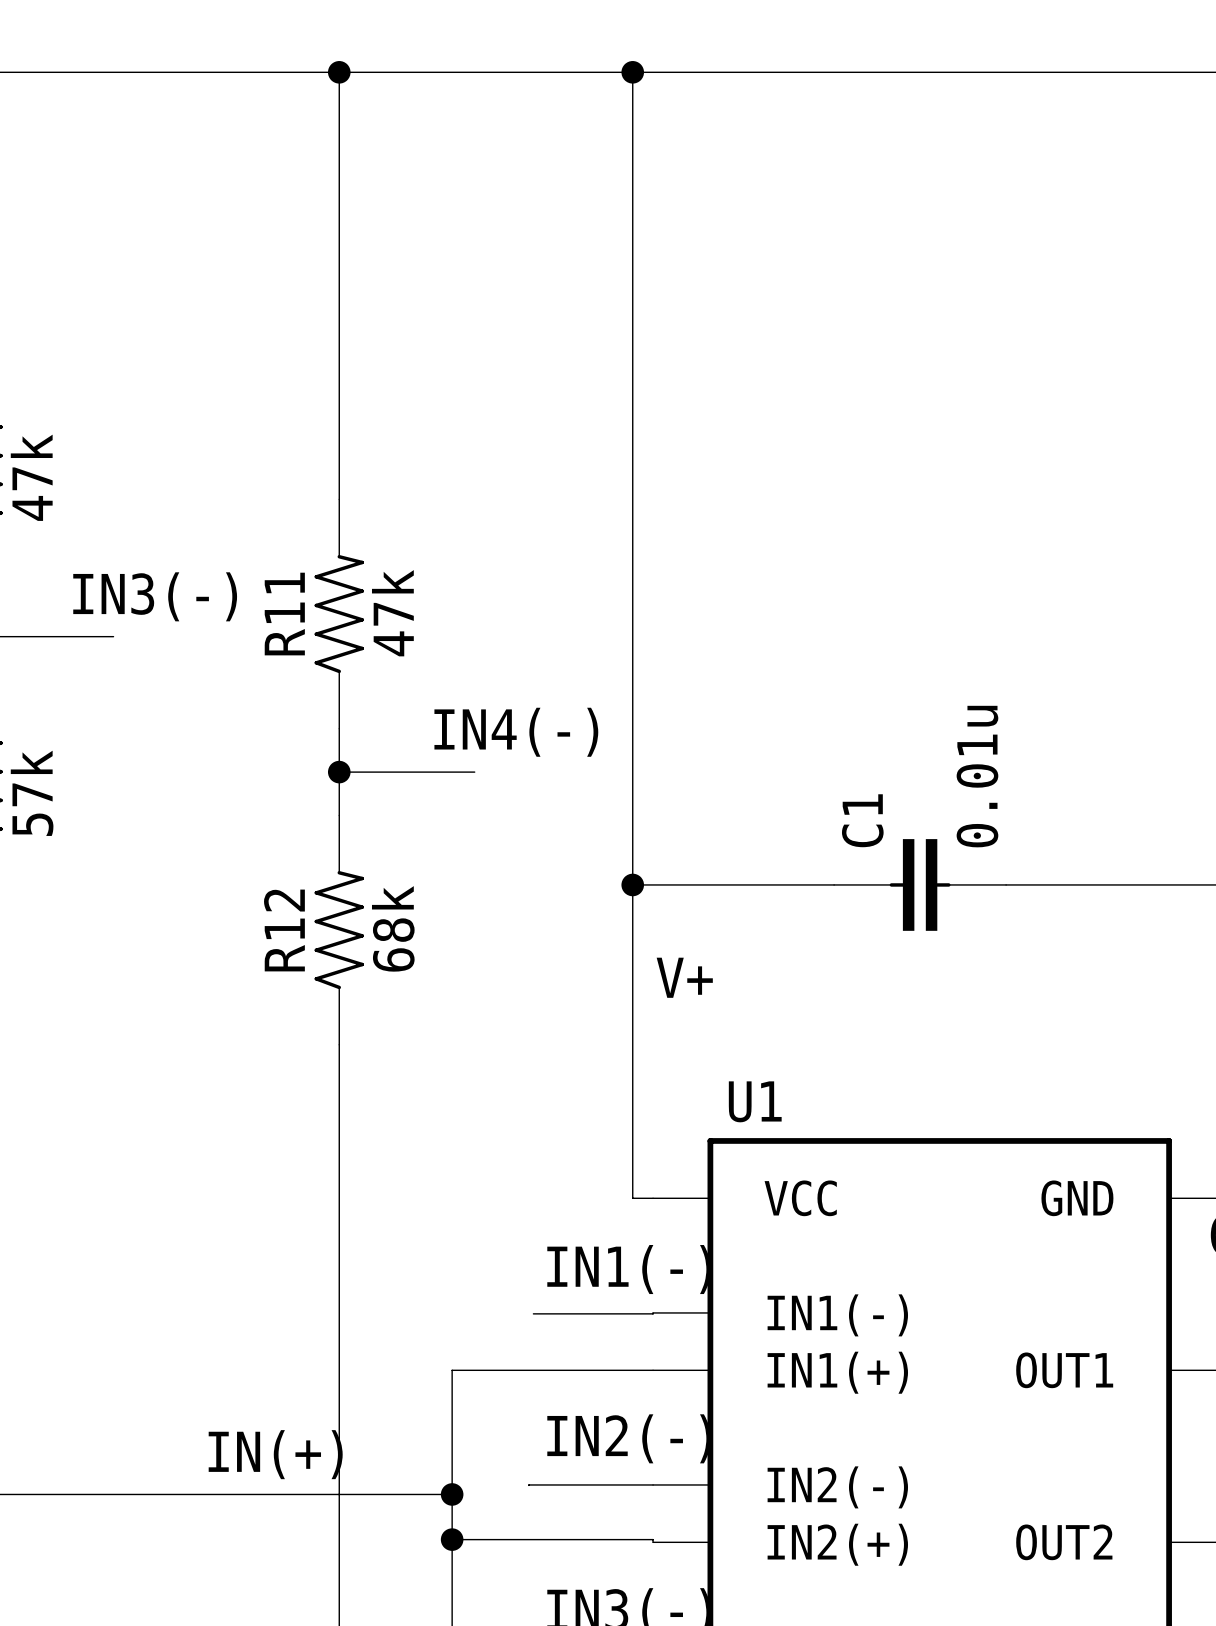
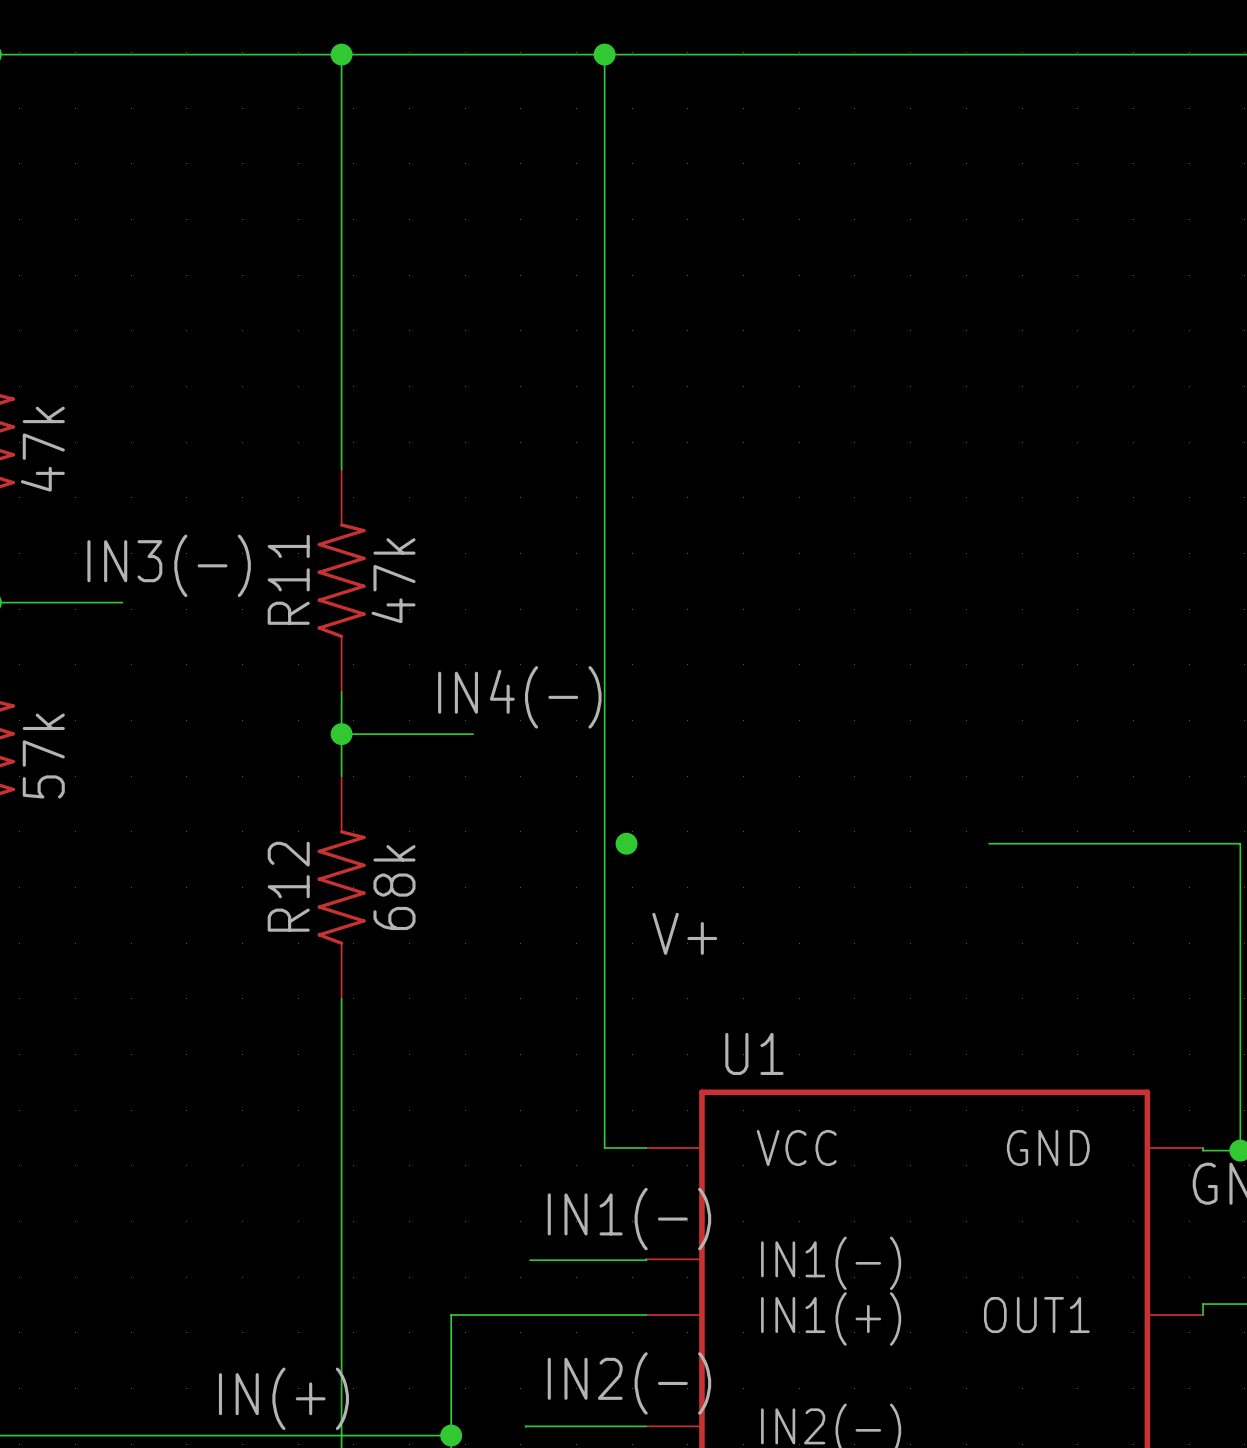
wire: (632, 72) (632, 1198) -> (604, 54) (604, 1147) (626, 1147)
junction position: (632, 72) -> (604, 54)
wire: (632, 884) (834, 884) -> none
C1: 0.01u (920, 884) -> none

